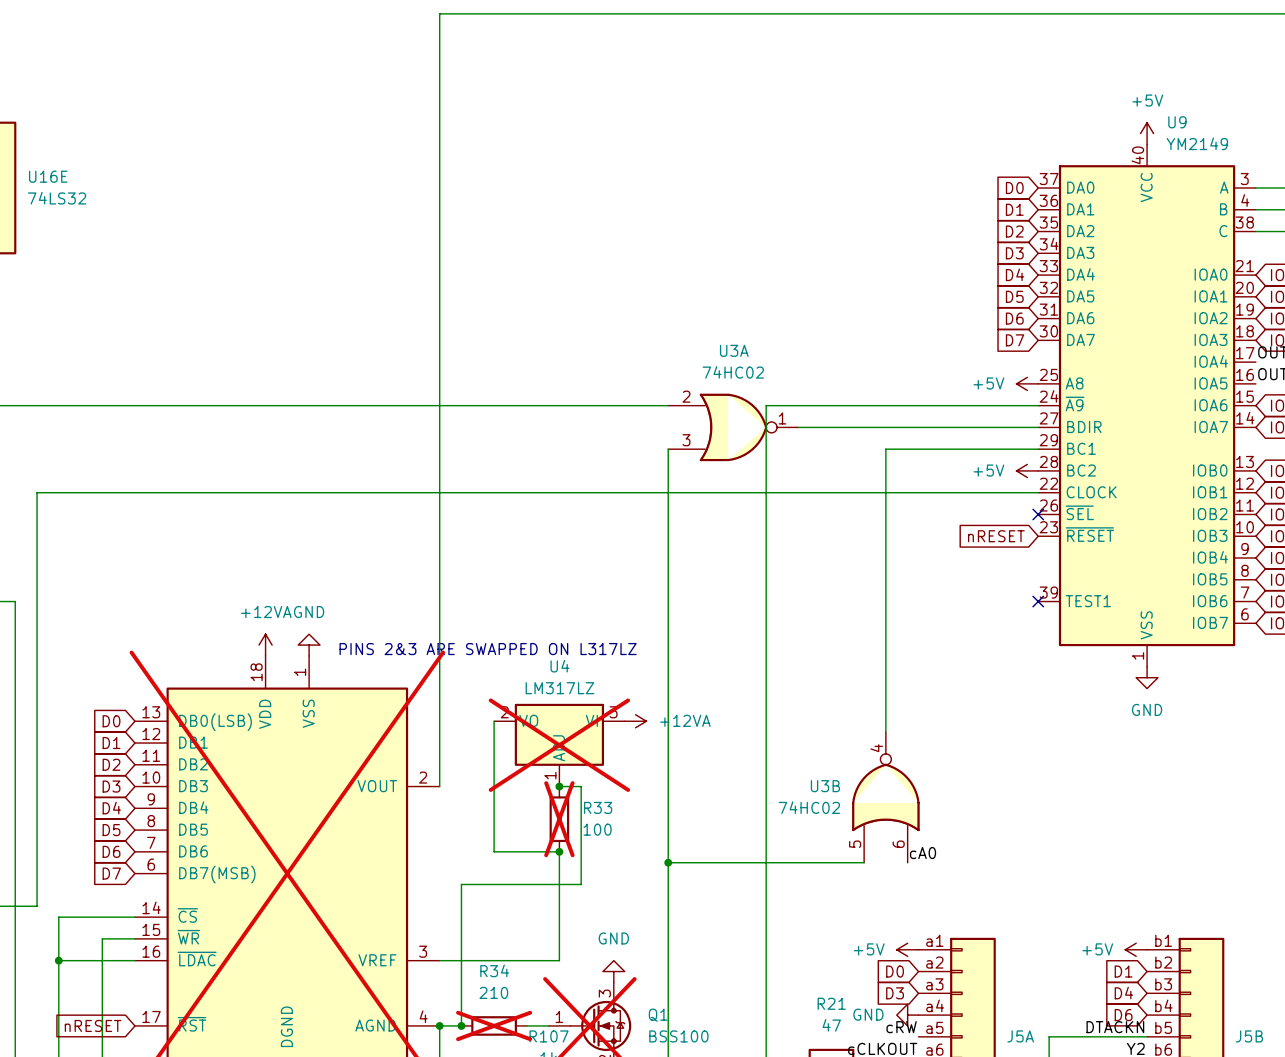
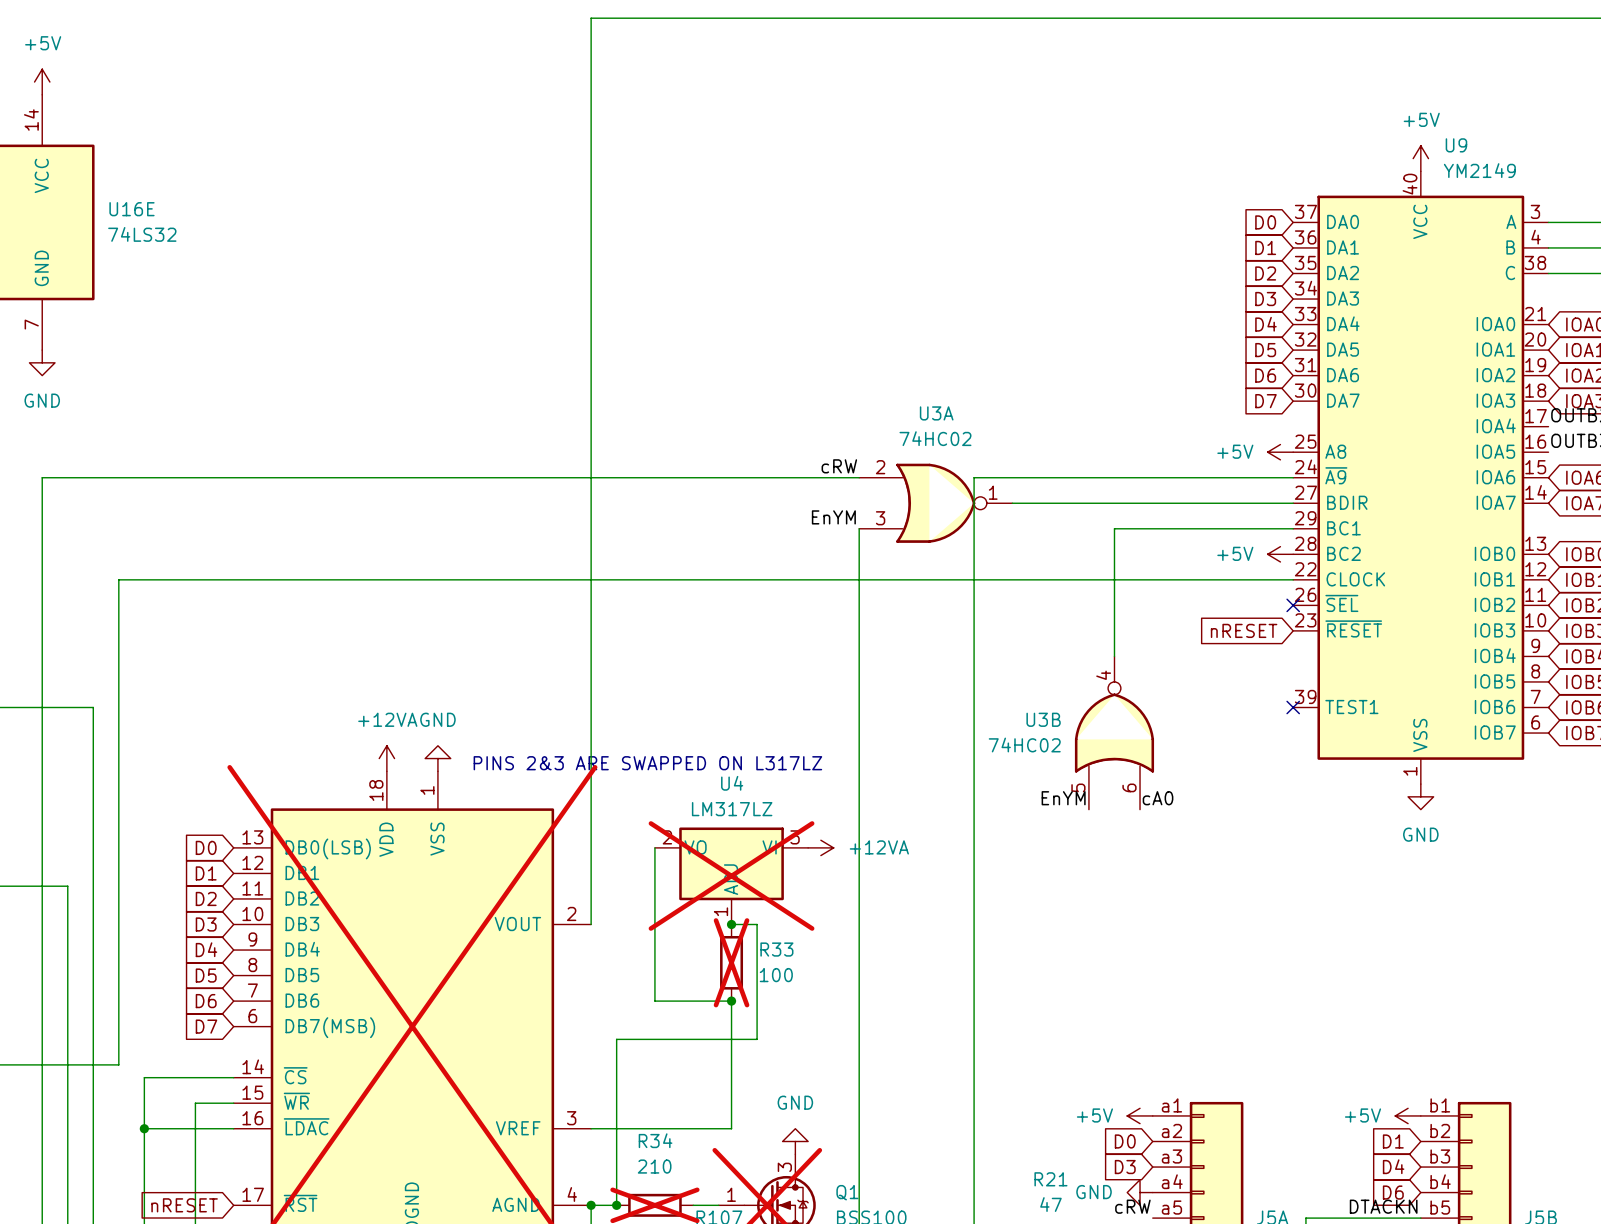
label: none -> cRW (839, 466)
label: none -> EnYM (833, 517)
wire: (885, 558) (885, 732) -> none
label: none -> EnYM (1063, 798)
U3B position: (885, 797) -> (1114, 733)
label position: cA0 (923, 853) -> cA0 (1158, 798)
wire: (668, 862) (864, 862) -> none
junction: (668, 862) -> none

